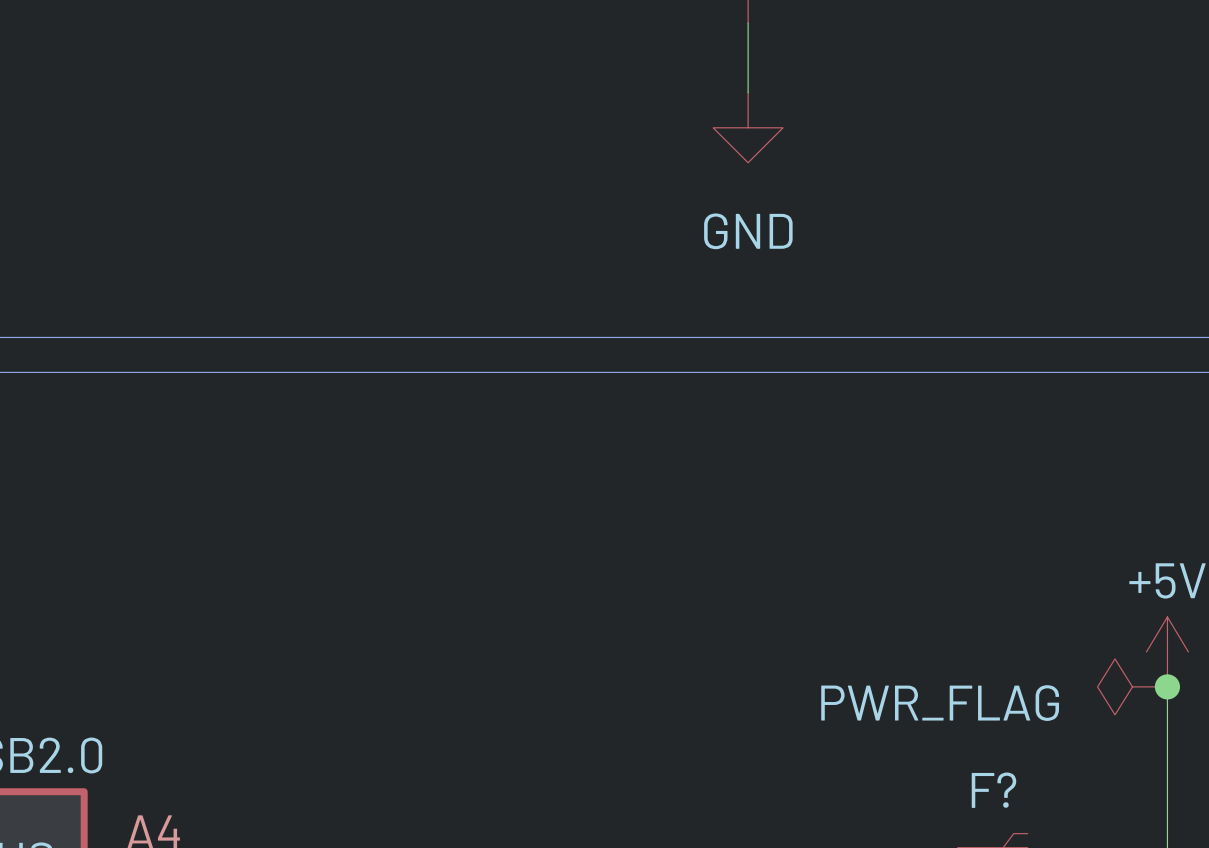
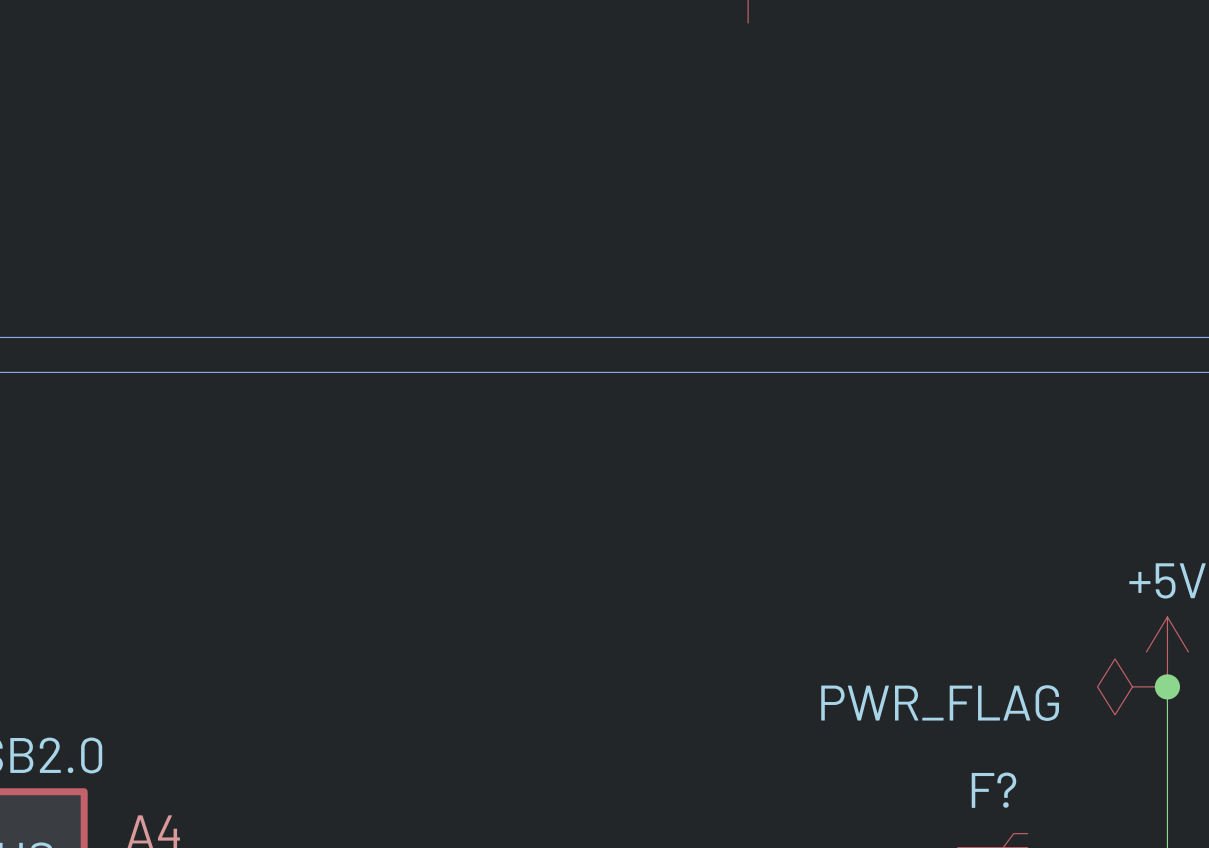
wire: (748, 22) (748, 92) -> none
power symbol: GND (748, 127) -> none

